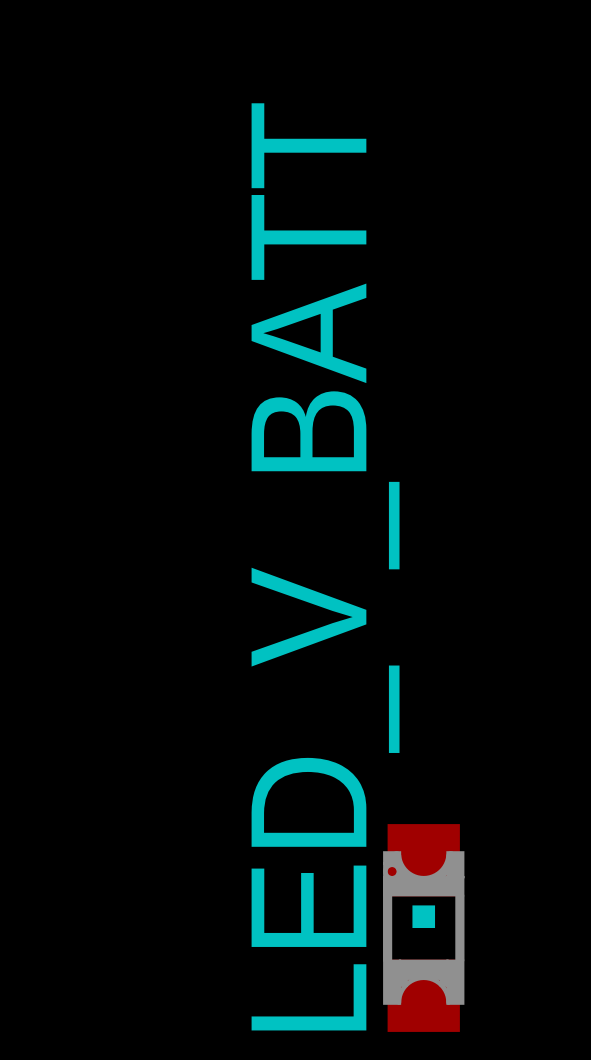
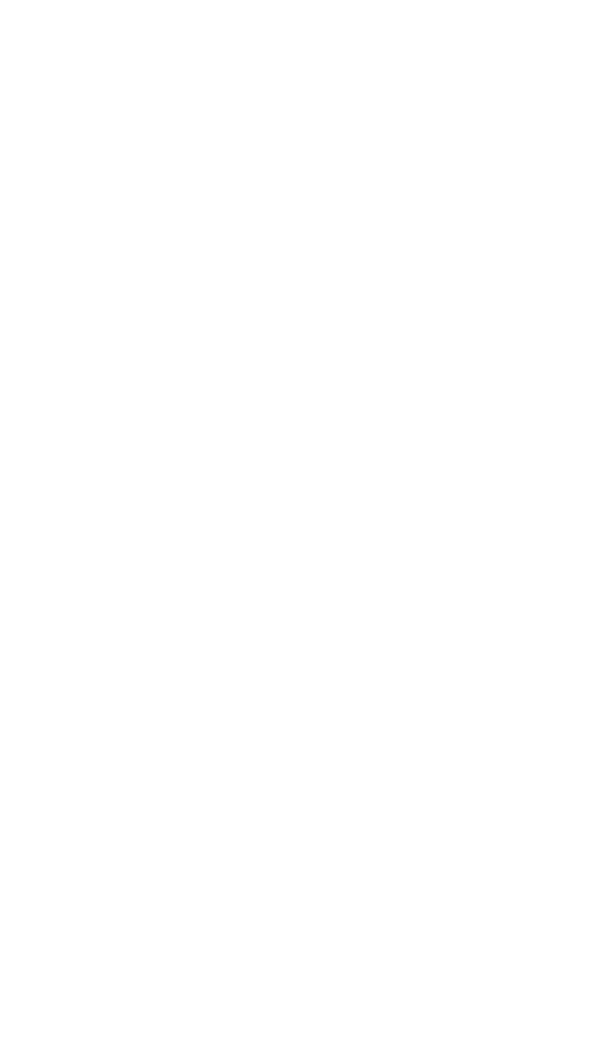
LED_V_BATT: (423, 928) -> none

